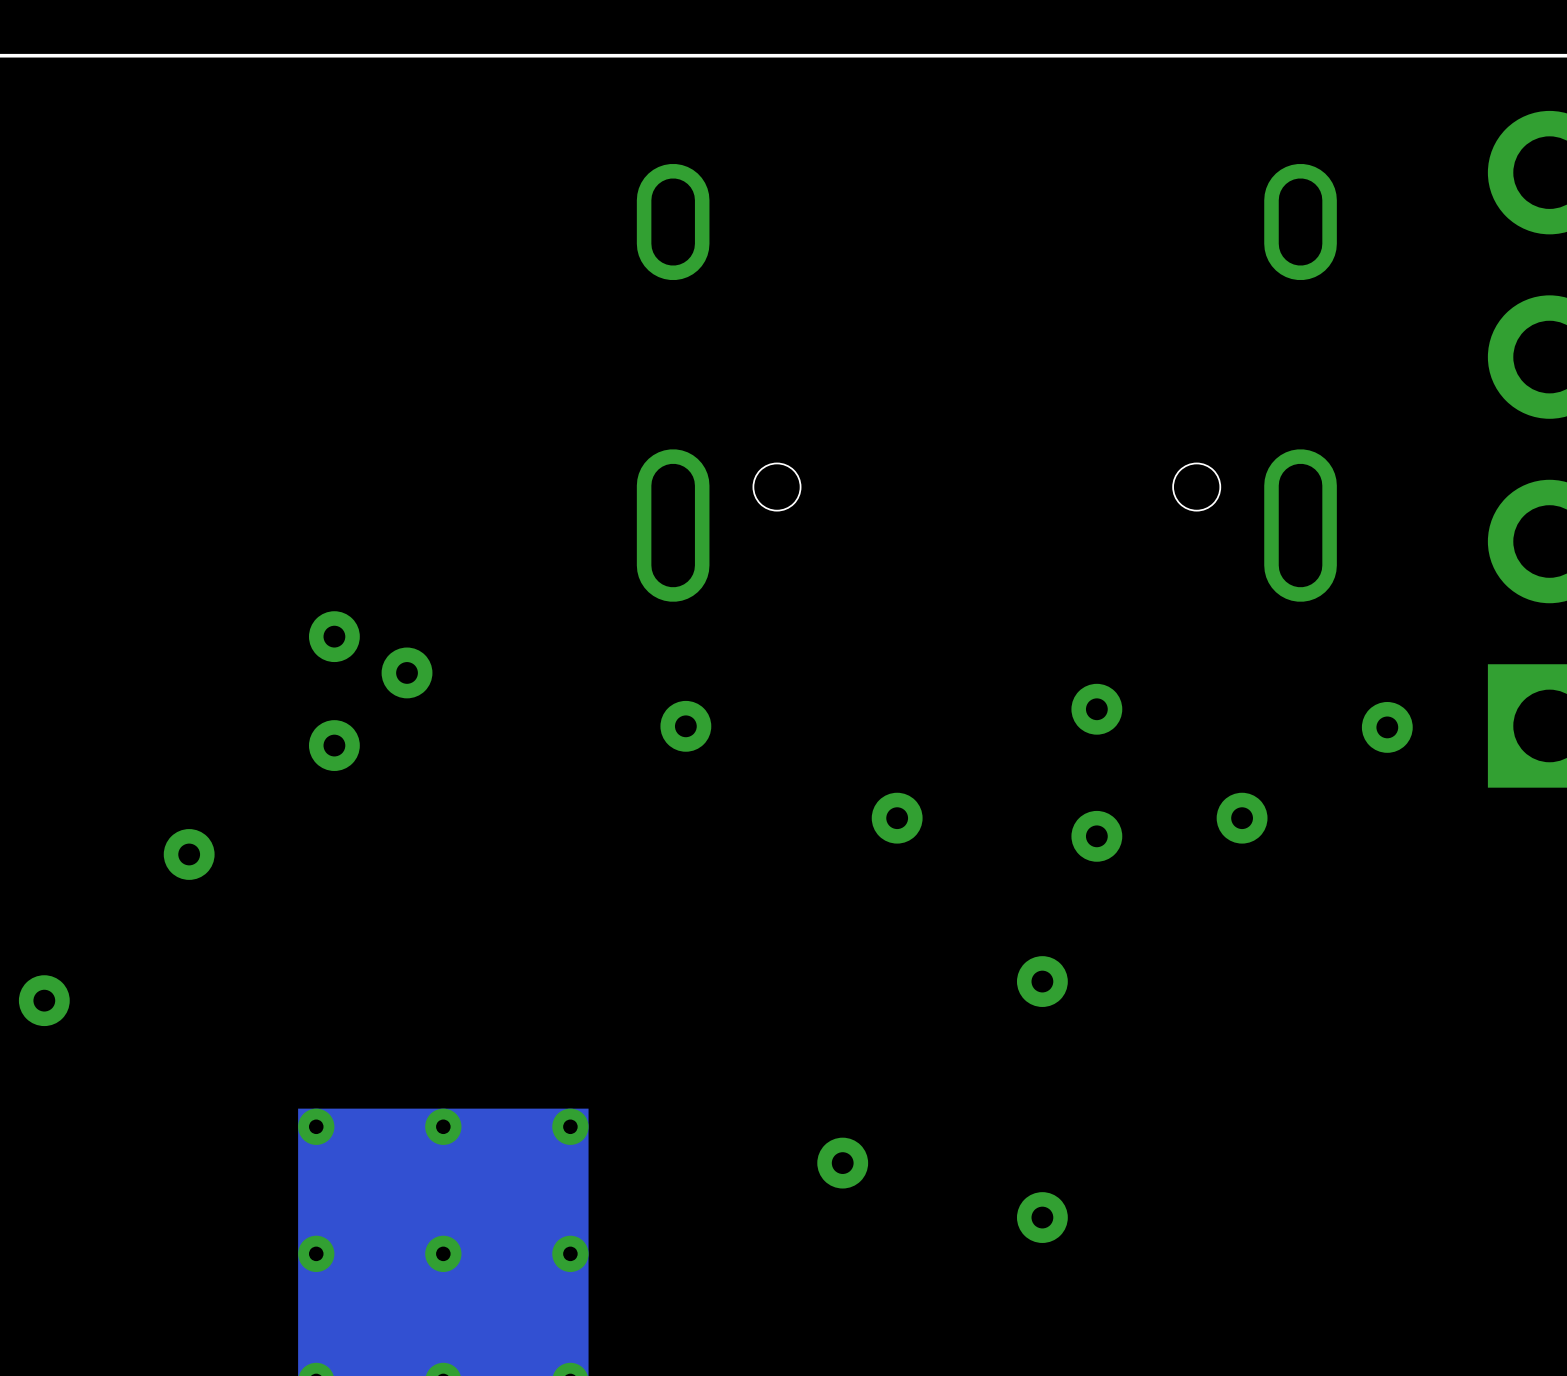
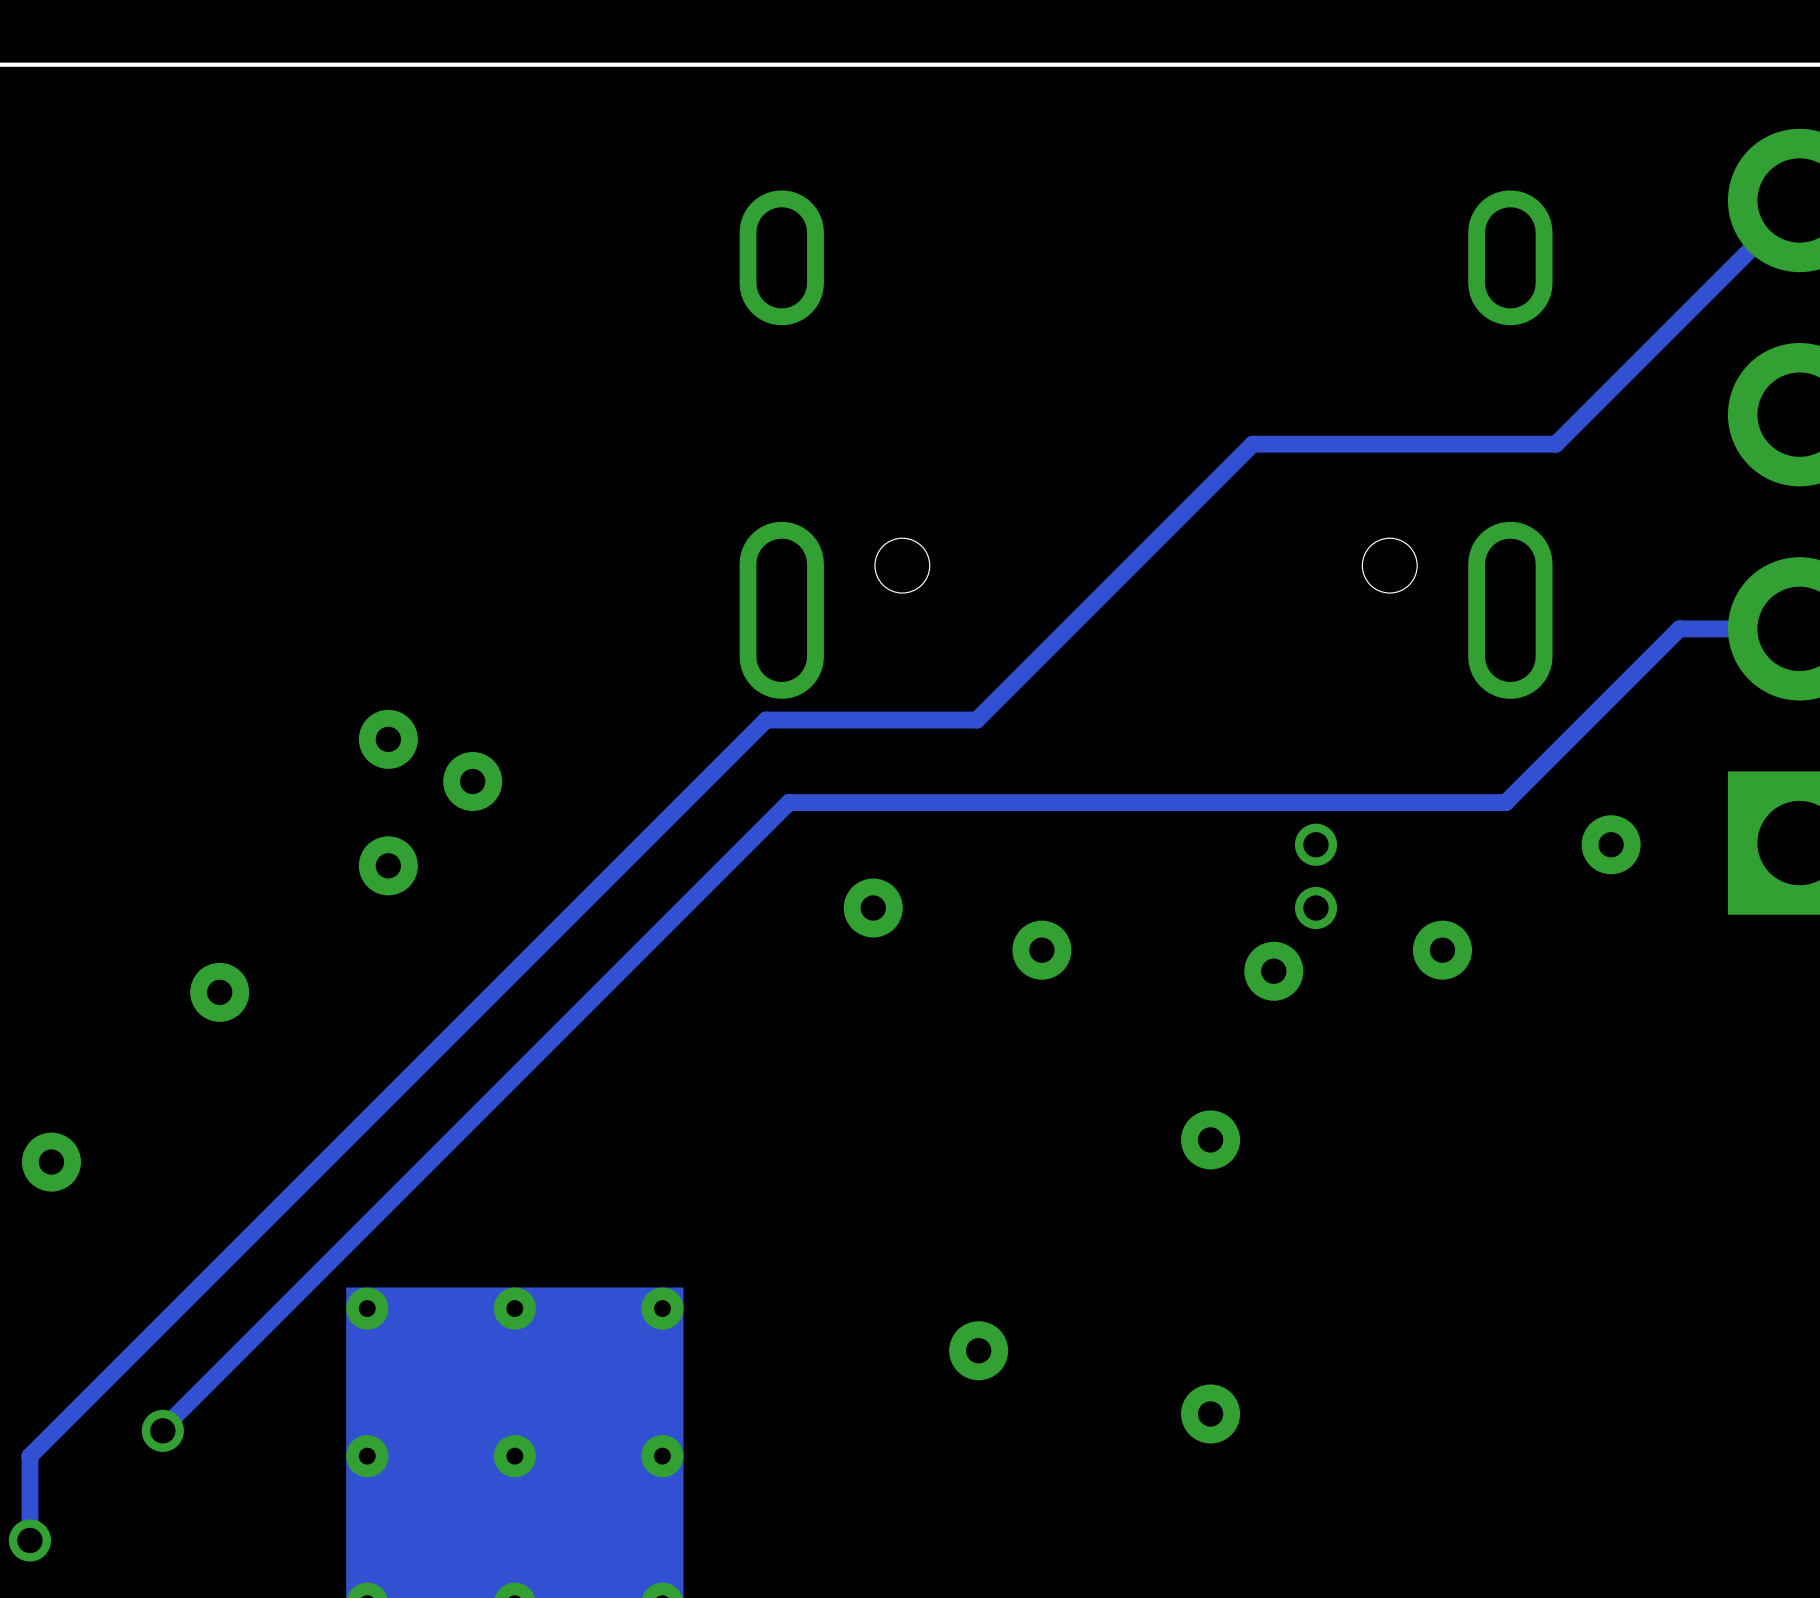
track: none -> (1799, 200) (1555, 444) (1252, 444) (976, 720) (766, 720) (29, 1456) (29, 1540)
track: none -> (1799, 628) (1679, 628) (1505, 802) (788, 802) (162, 1428) (162, 1430)
via position: (1096, 709) -> (1315, 844)
via position: (685, 726) -> (873, 908)
via: none -> (1315, 908)
via: none -> (162, 1430)
via: none -> (29, 1540)

